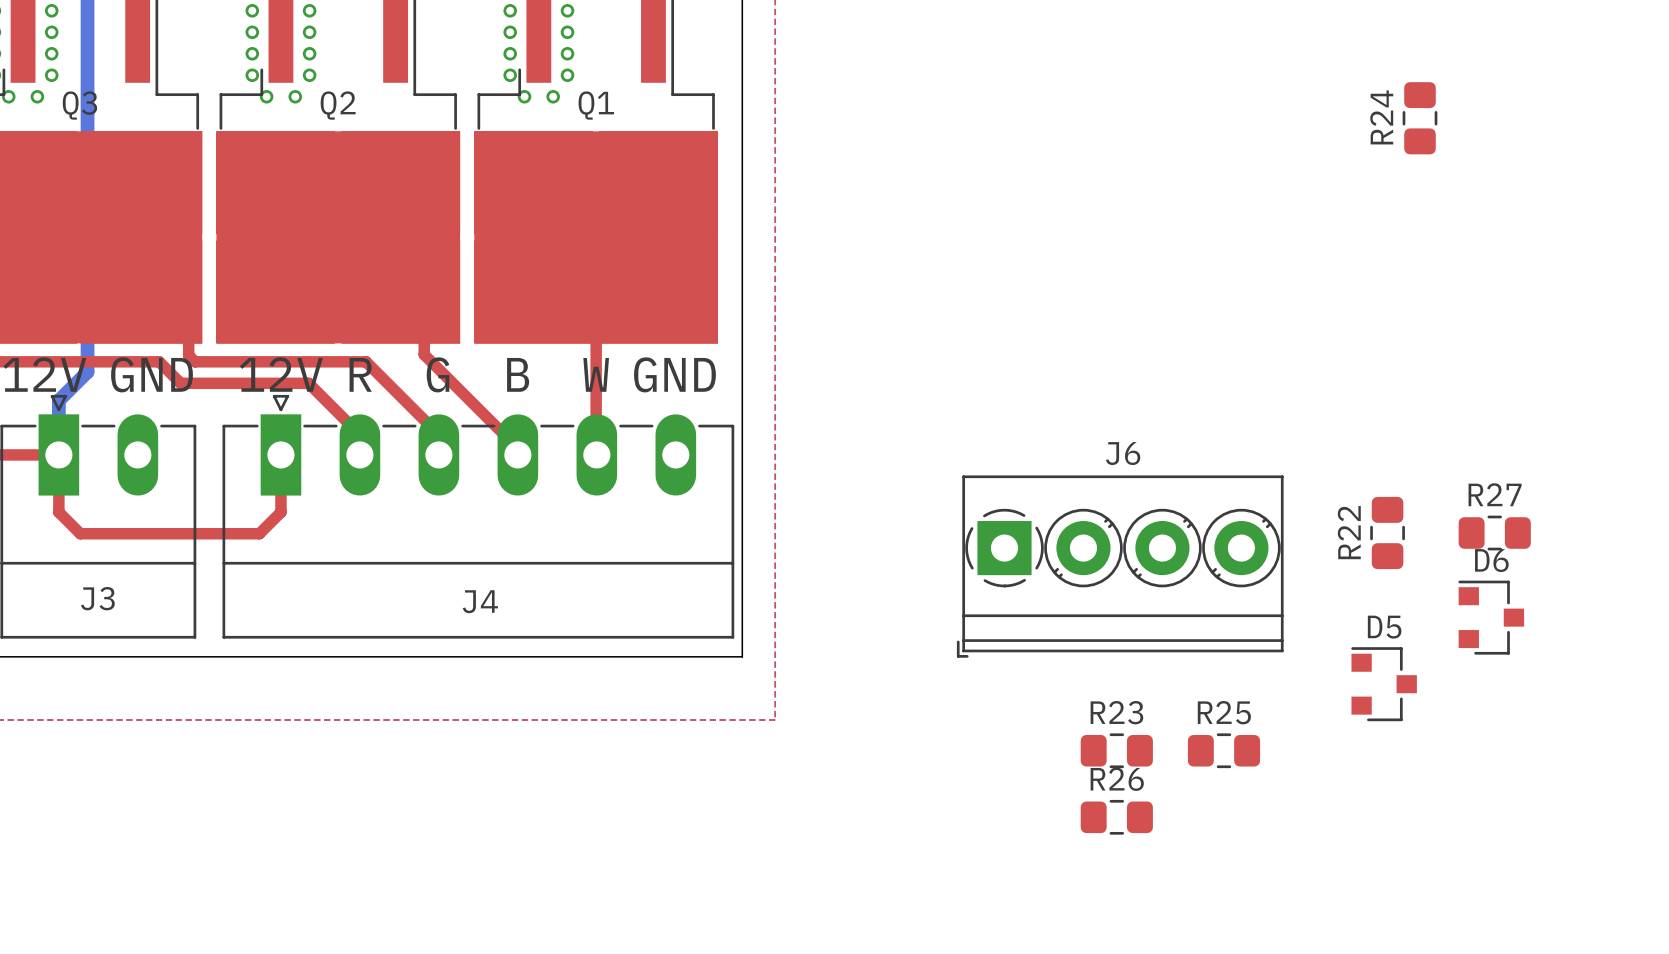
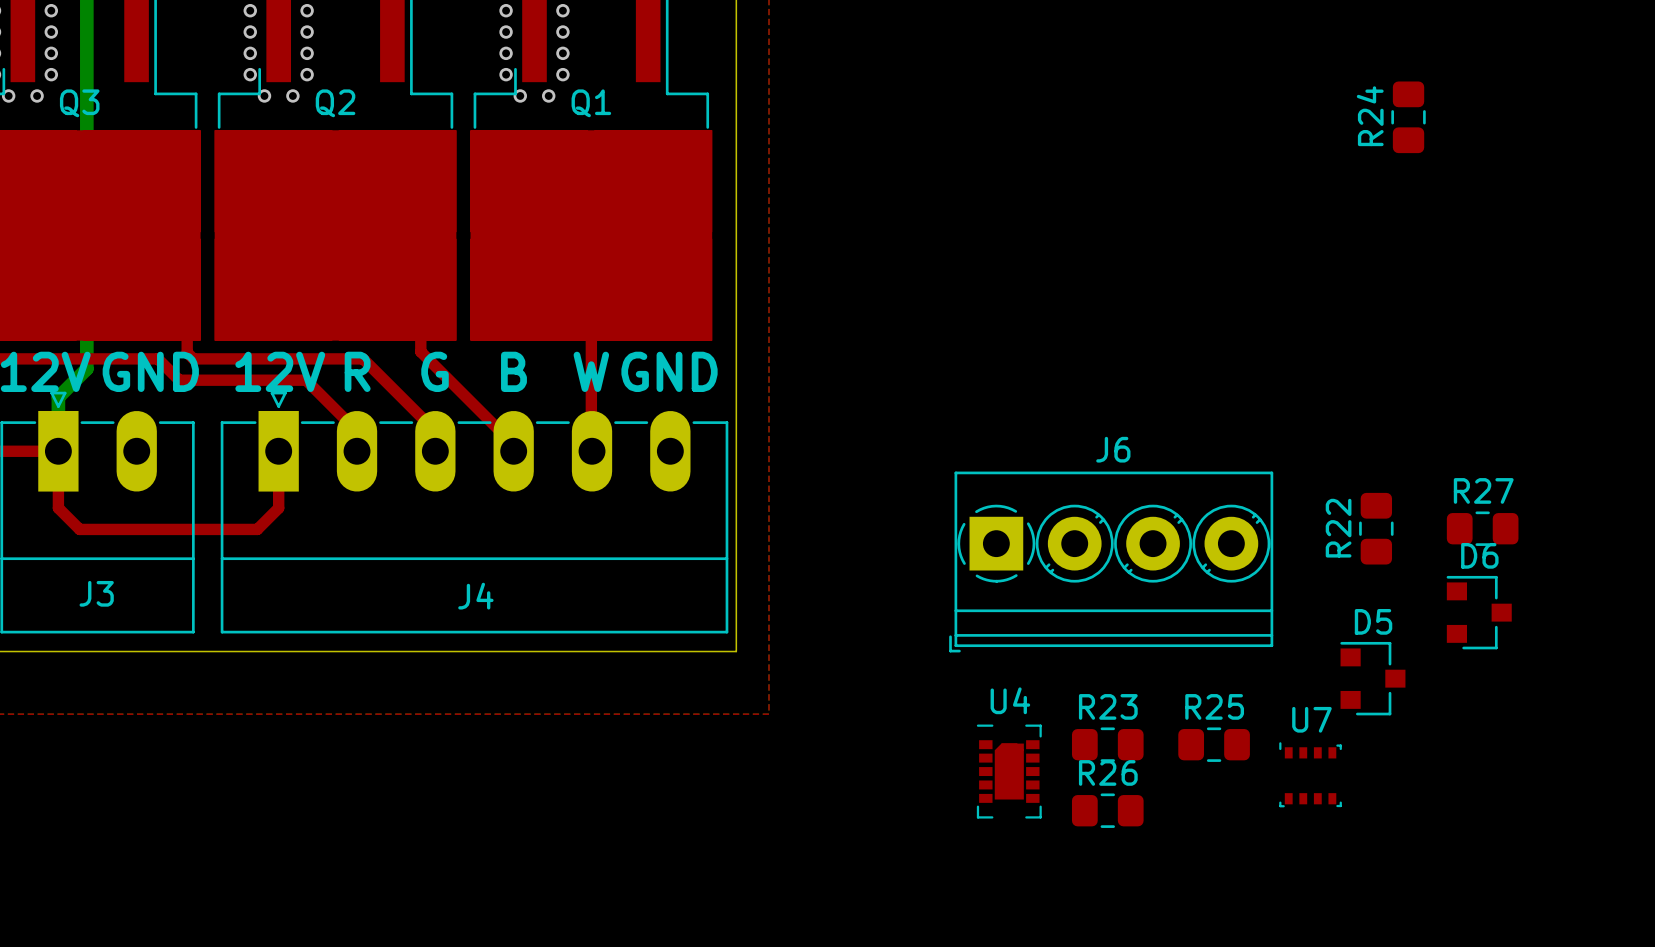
U4: none -> (1009, 771)
U7: none -> (1310, 774)

